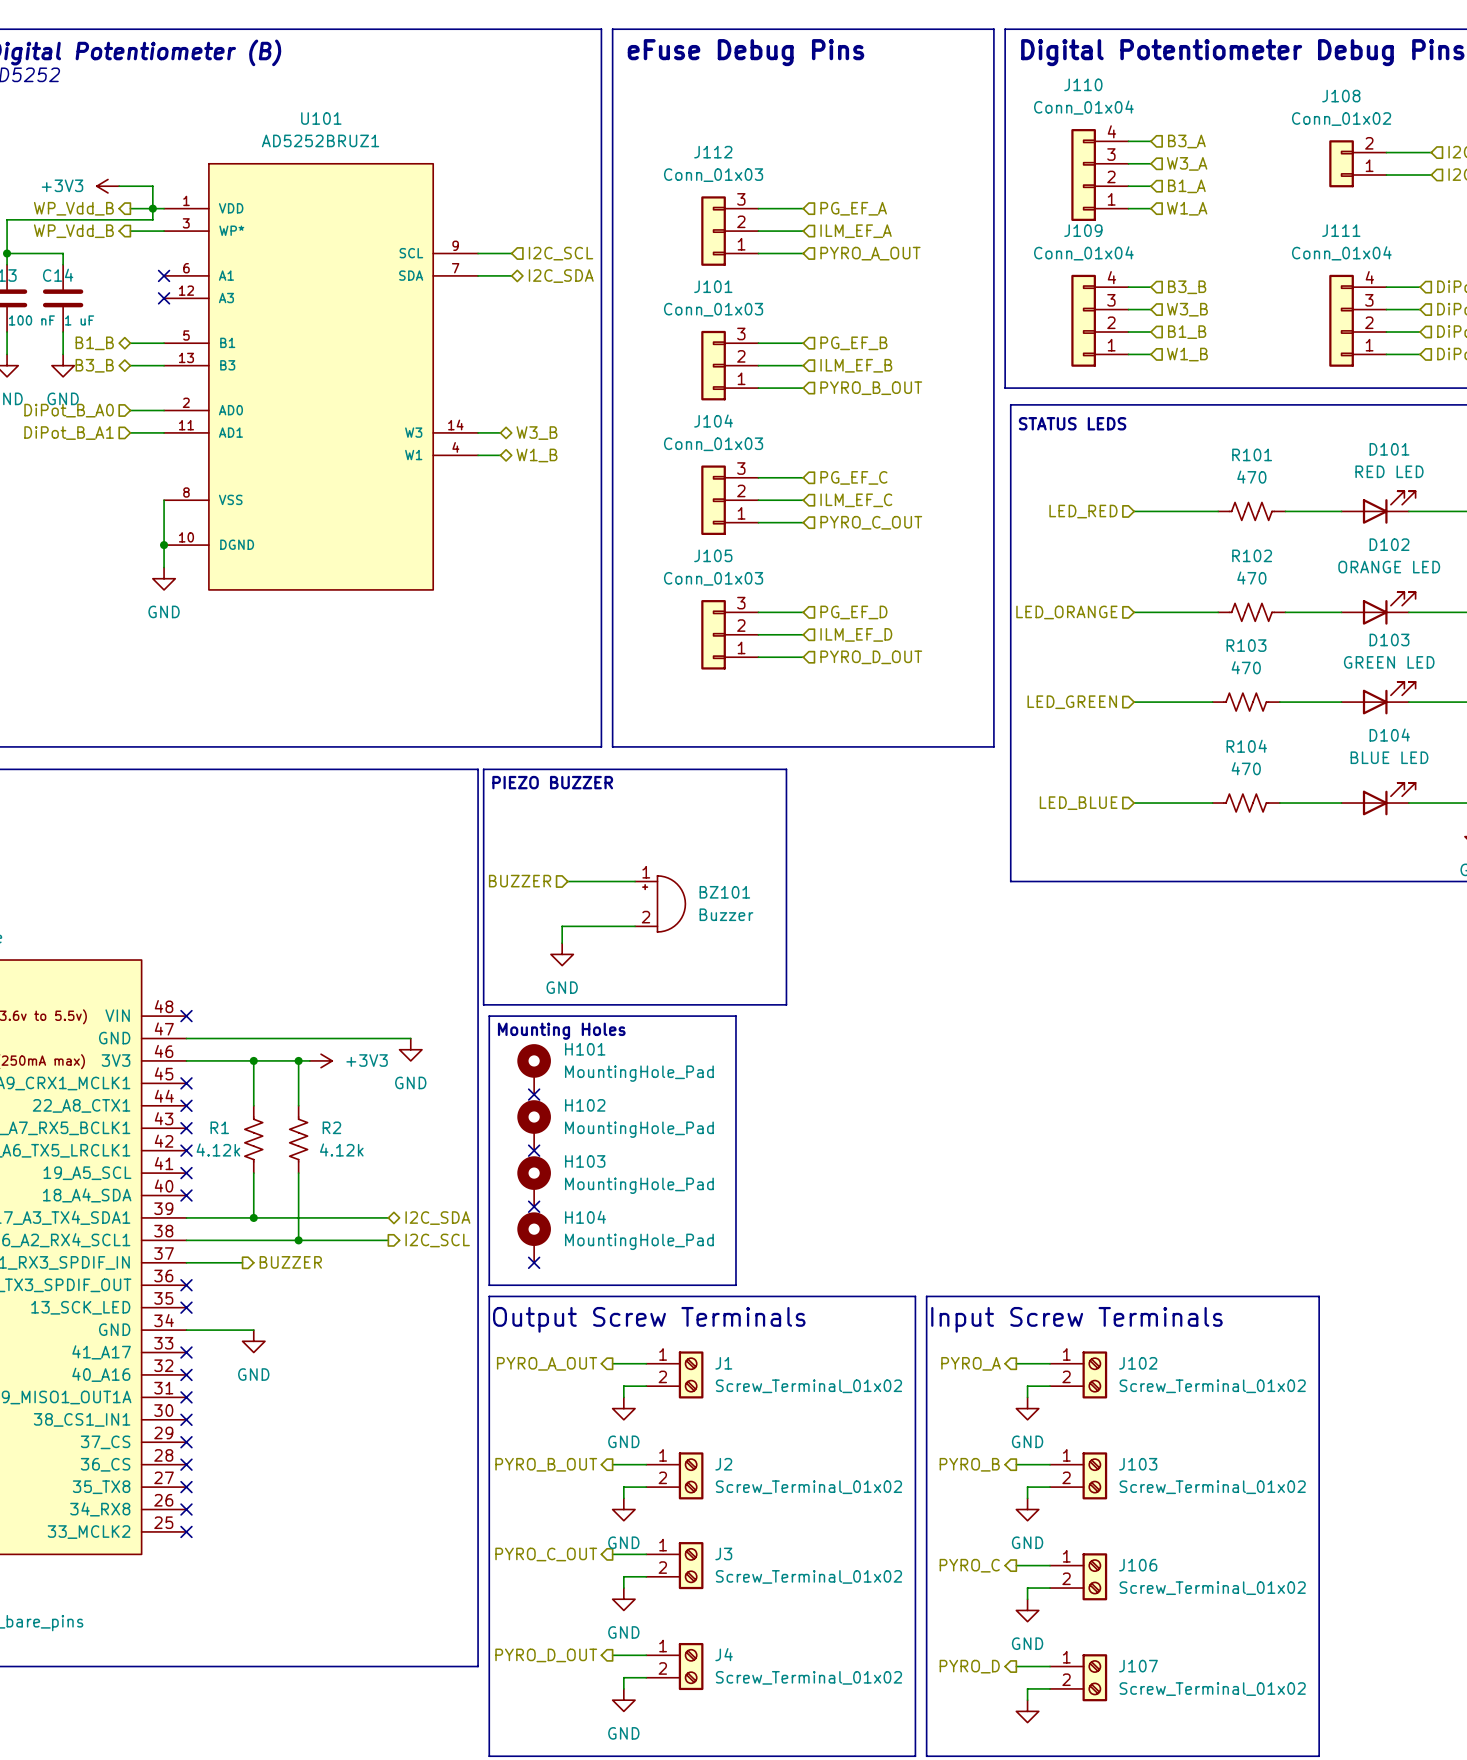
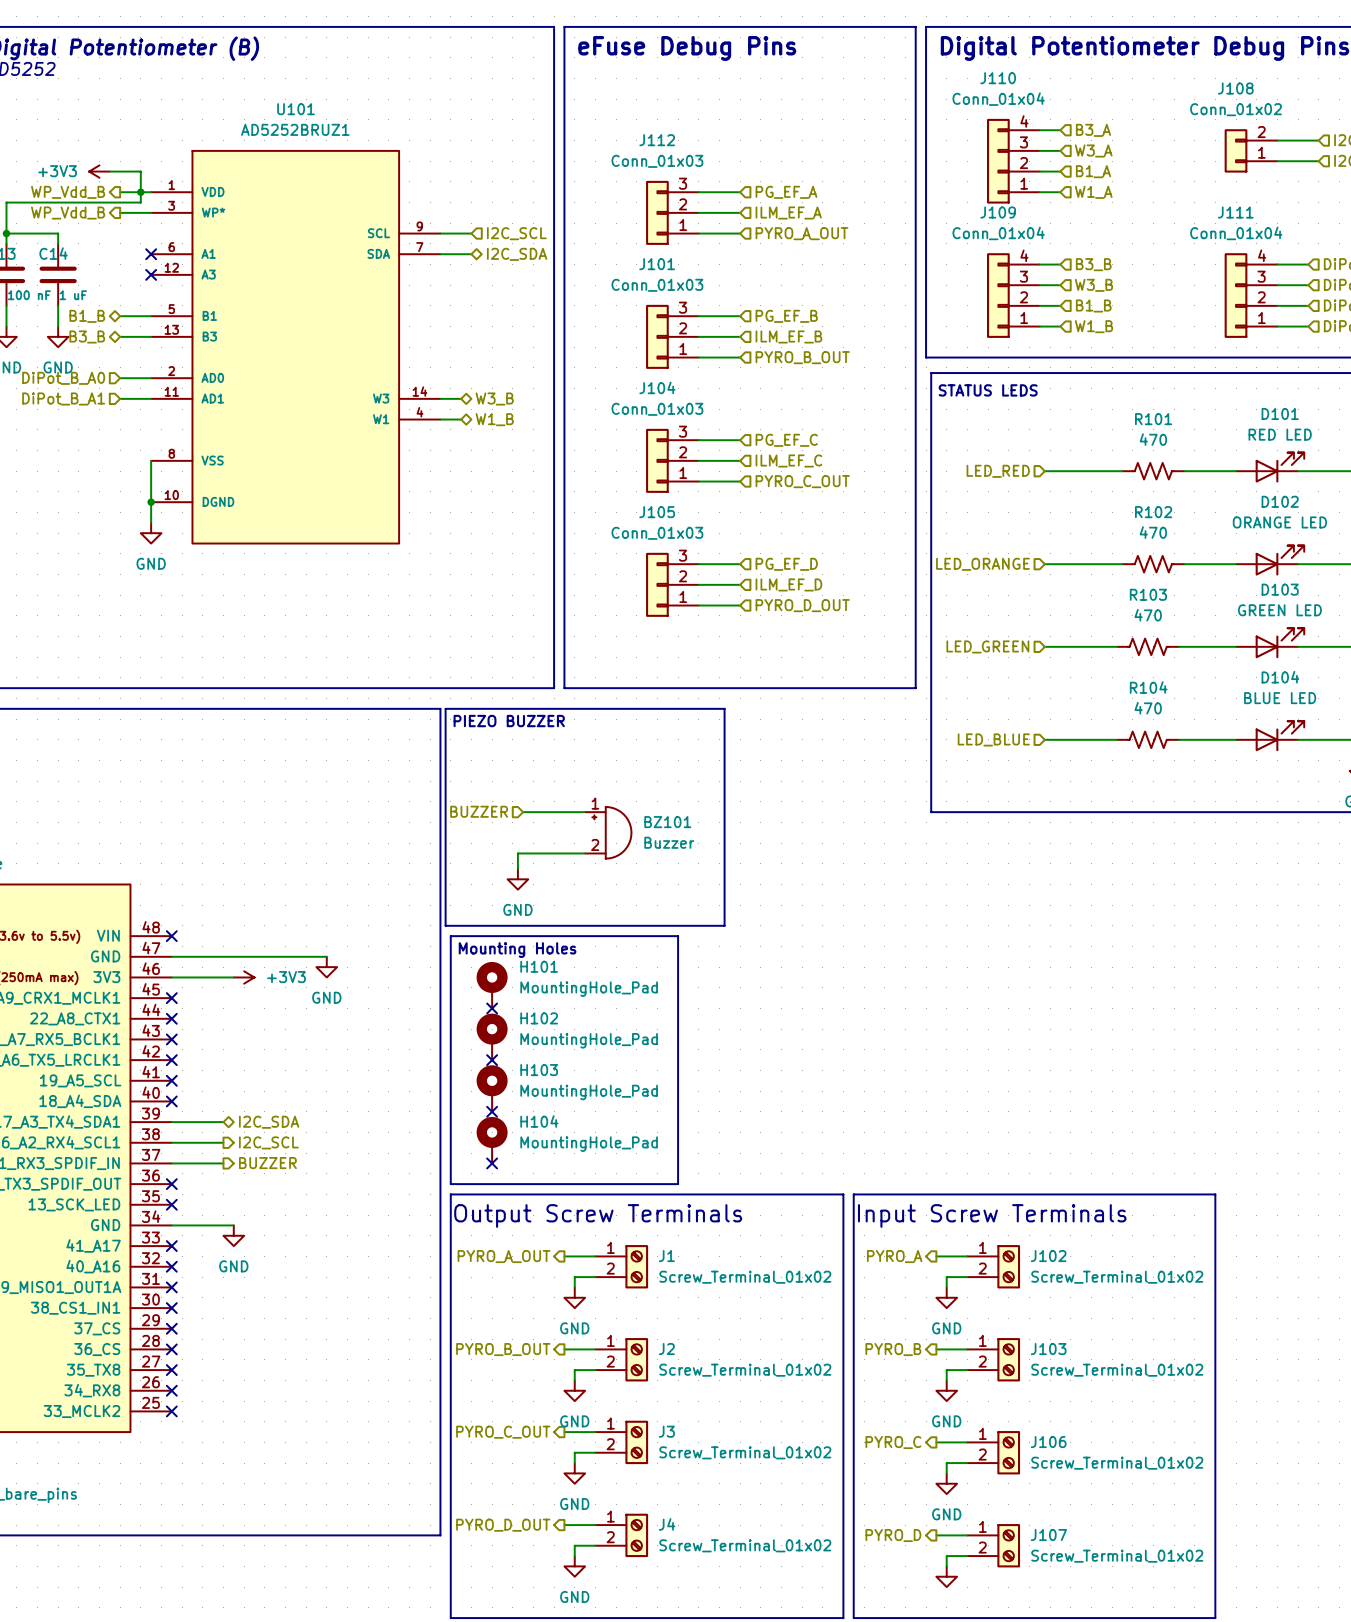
wire: (354, 1038) (410, 1038) -> none
power symbol position: GND (410, 1049) -> GND (326, 967)
junction: (253, 1060) -> none
wire: (298, 1060) (298, 1105) -> none
junction: (298, 1060) -> none
wire: (309, 1060) (253, 1060) (253, 1105) -> none
power symbol position: +3V3 (321, 1060) -> +3V3 (244, 977)
R1: 4.12k (253, 1139) -> none
R2: 4.12k (298, 1139) -> none
wire: (253, 1173) (253, 1217) -> none
wire: (298, 1173) (298, 1240) -> none
wire: (242, 1217) (388, 1217) -> none
junction: (253, 1217) -> none
hierarchical label position: I2C_SDA (437, 1218) -> I2C_SDA (269, 1122)
wire: (242, 1240) (388, 1240) -> none
junction: (298, 1240) -> none
hierarchical label position: I2C_SCL (437, 1240) -> I2C_SCL (268, 1142)

